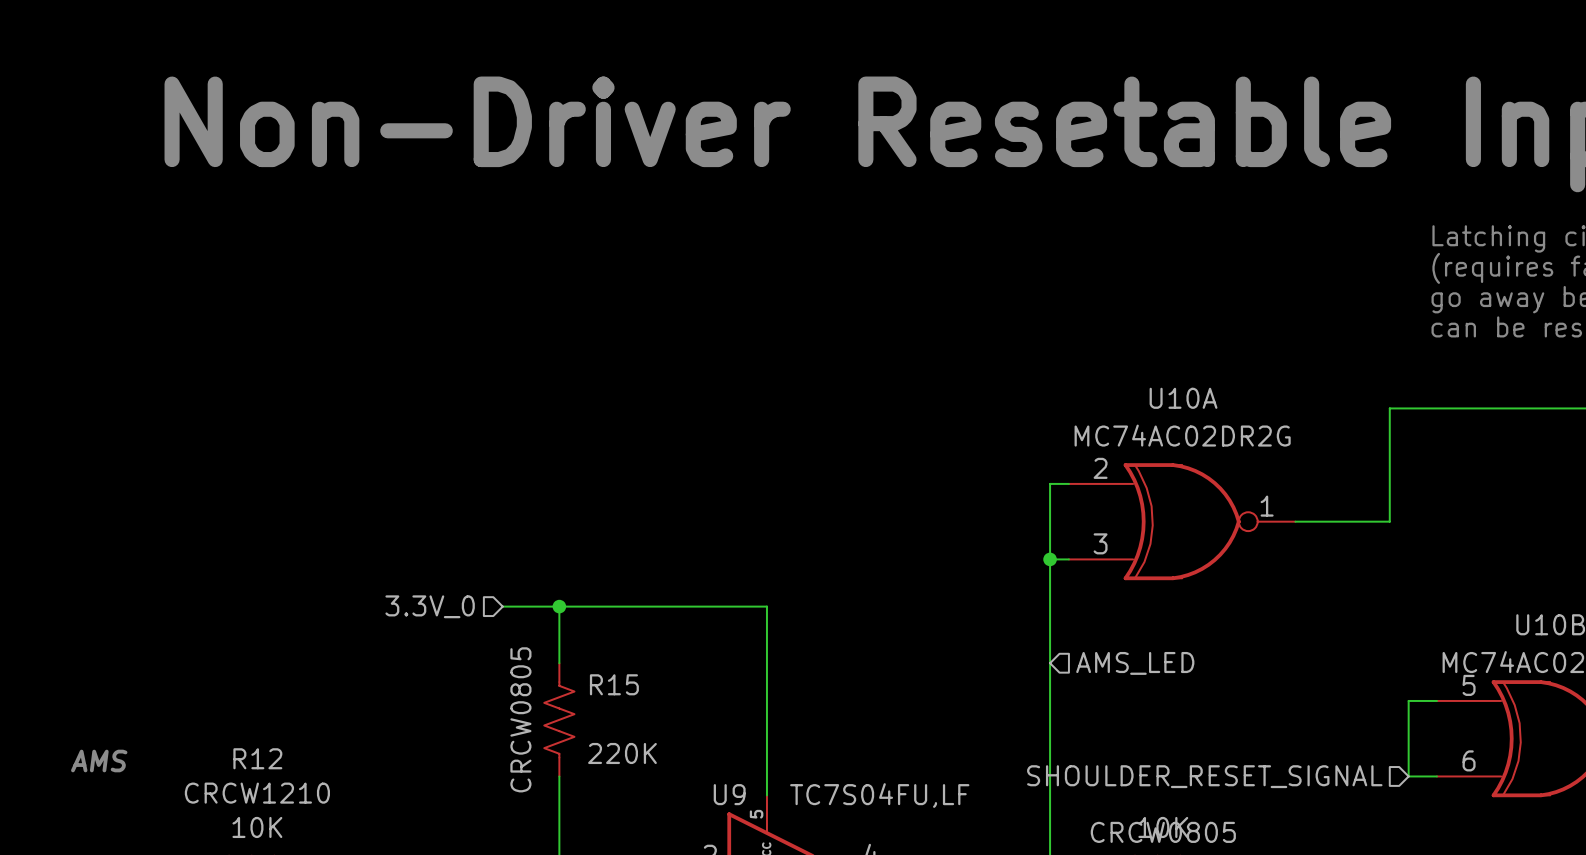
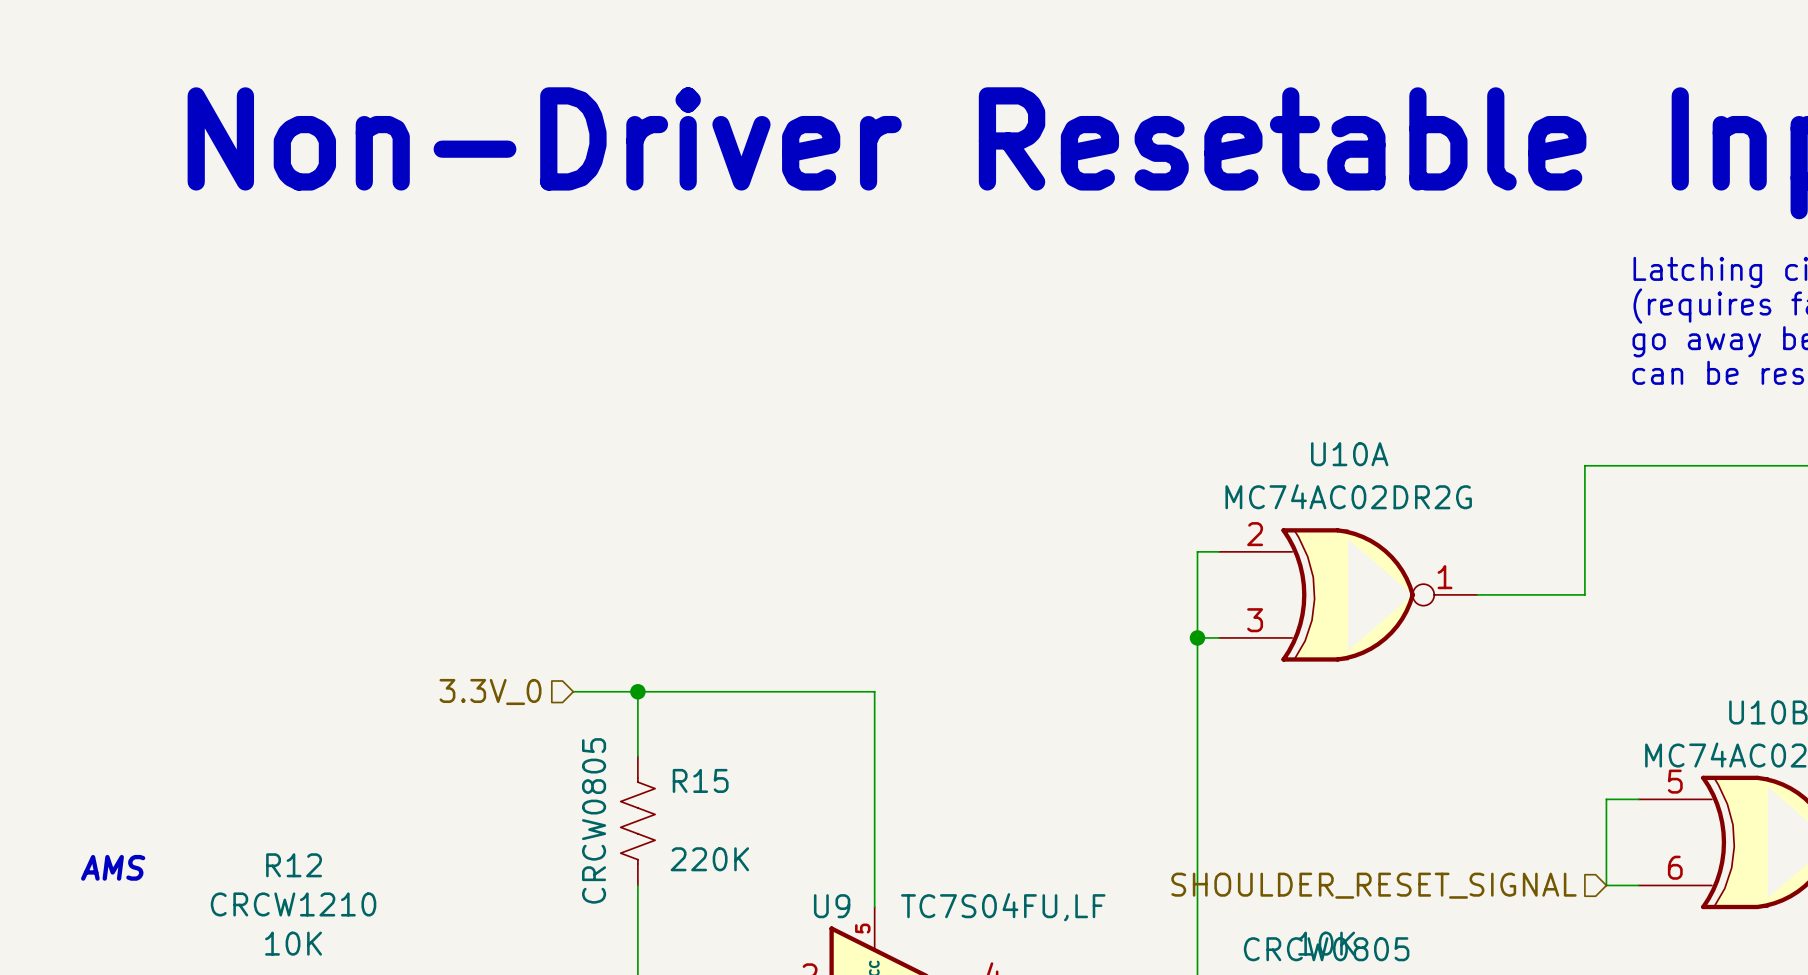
hierarchical label: AMS_LED (1135, 663) -> none

